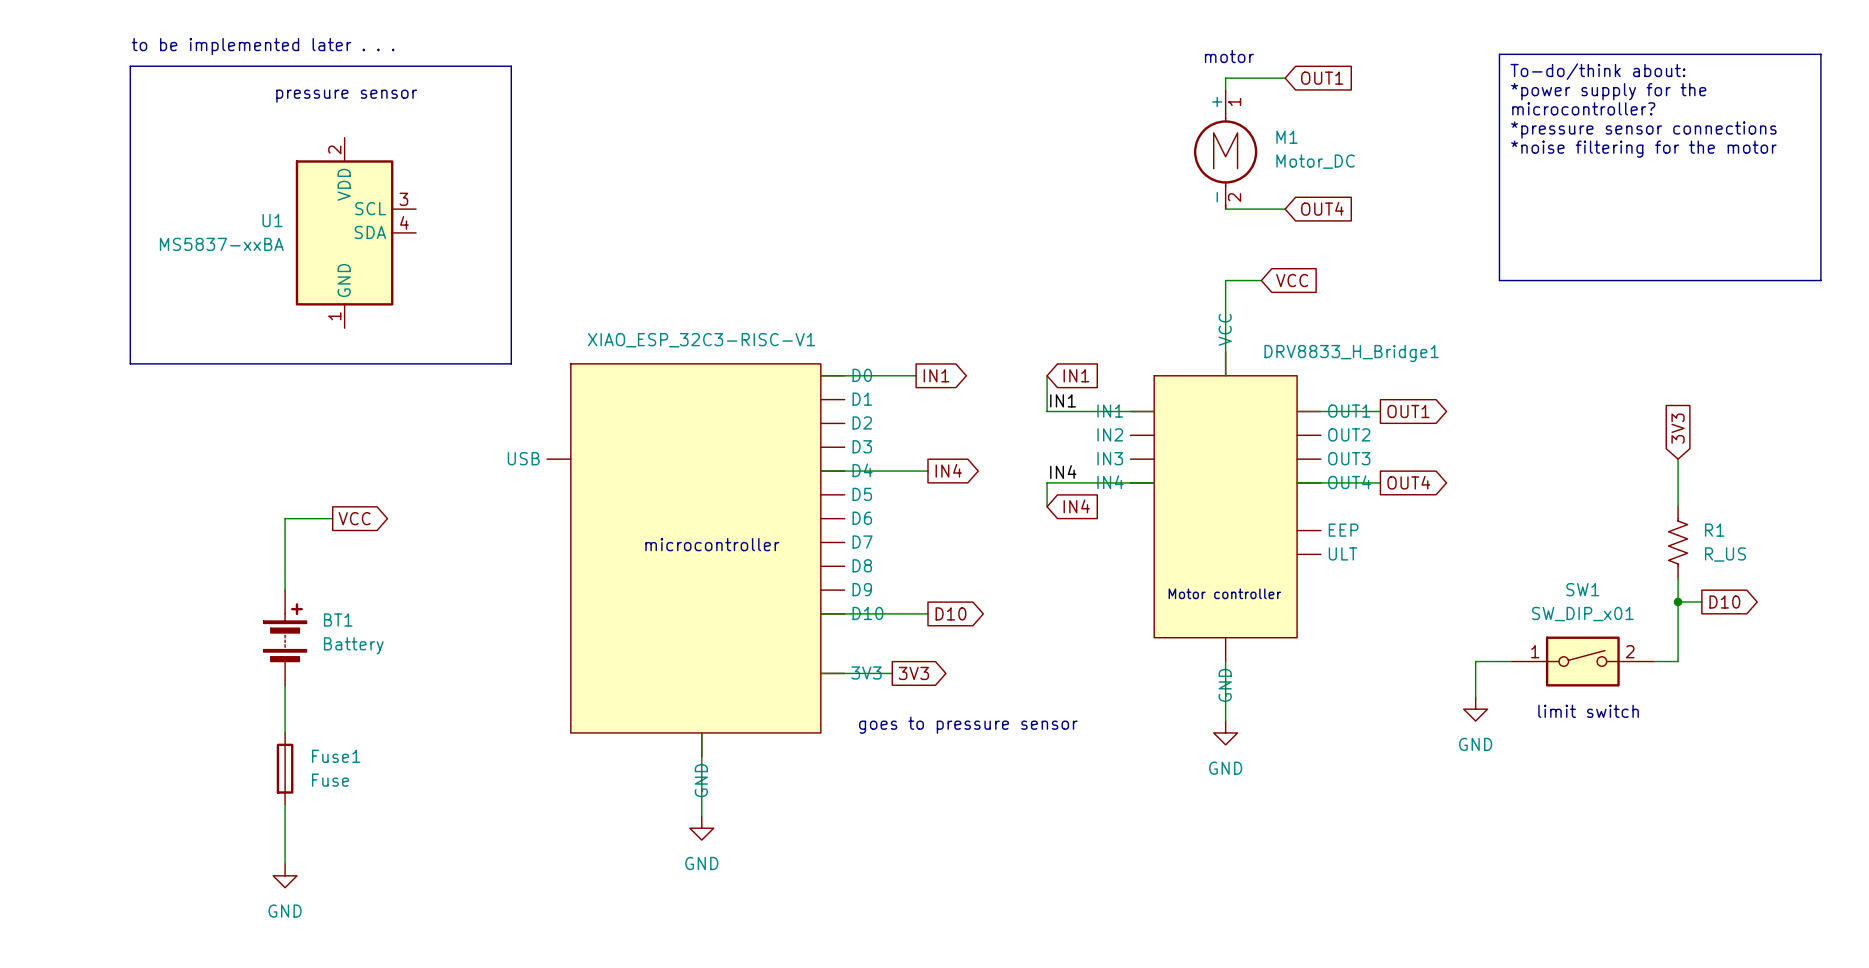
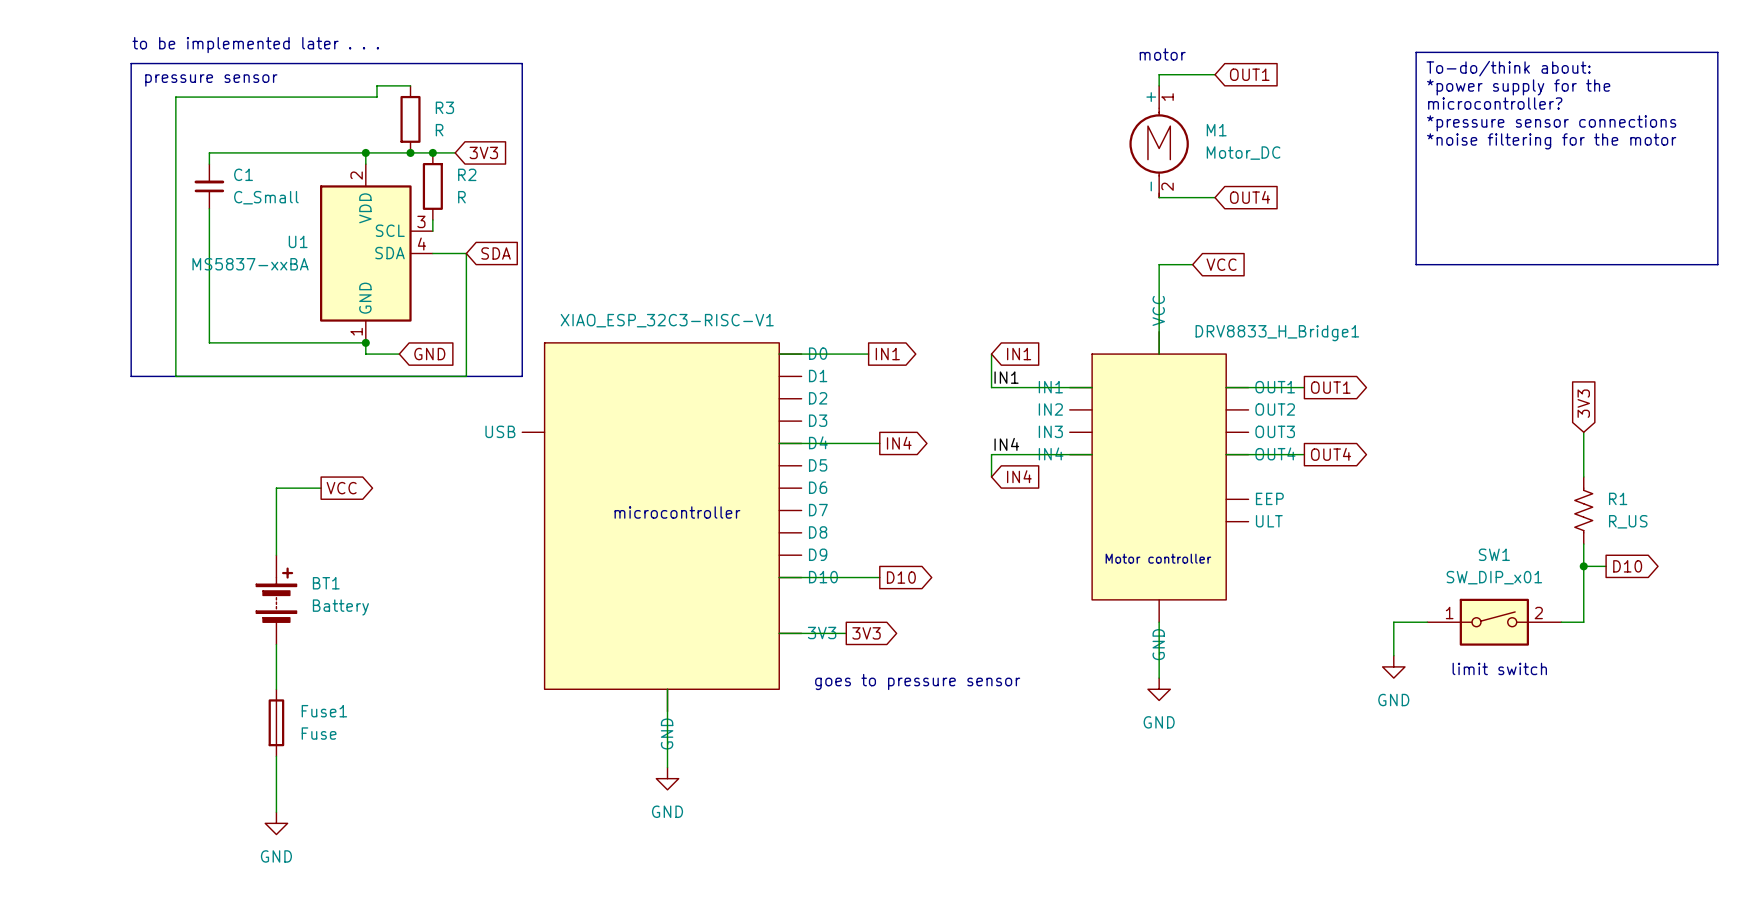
line: (511, 66) (511, 363) (130, 363) -> (488, 63) (522, 63) (522, 376) (131, 376) (131, 342)
wire: none -> (410, 85) (376, 85) (376, 97) (175, 97) (175, 376) (466, 376) (466, 253) (432, 253)
text position: pressure sensor (346, 96) -> pressure sensor (211, 80)
R3: none -> R (410, 119)
junction: none -> (365, 152)
junction: none -> (410, 152)
junction: none -> (432, 152)
wire: none -> (455, 152) (209, 152) (209, 164)
global label: none -> 3V3 (483, 152)
C1: none -> C_Small (209, 186)
R2: none -> R (432, 186)
wire: none -> (209, 208) (209, 342) (365, 342) (365, 354) (399, 354)
U1 position: (355, 232) -> (376, 253)
wire: none -> (432, 219) (432, 231)
global label: none -> SDA (496, 253)
junction: none -> (365, 342)
global label: none -> GND (429, 354)

